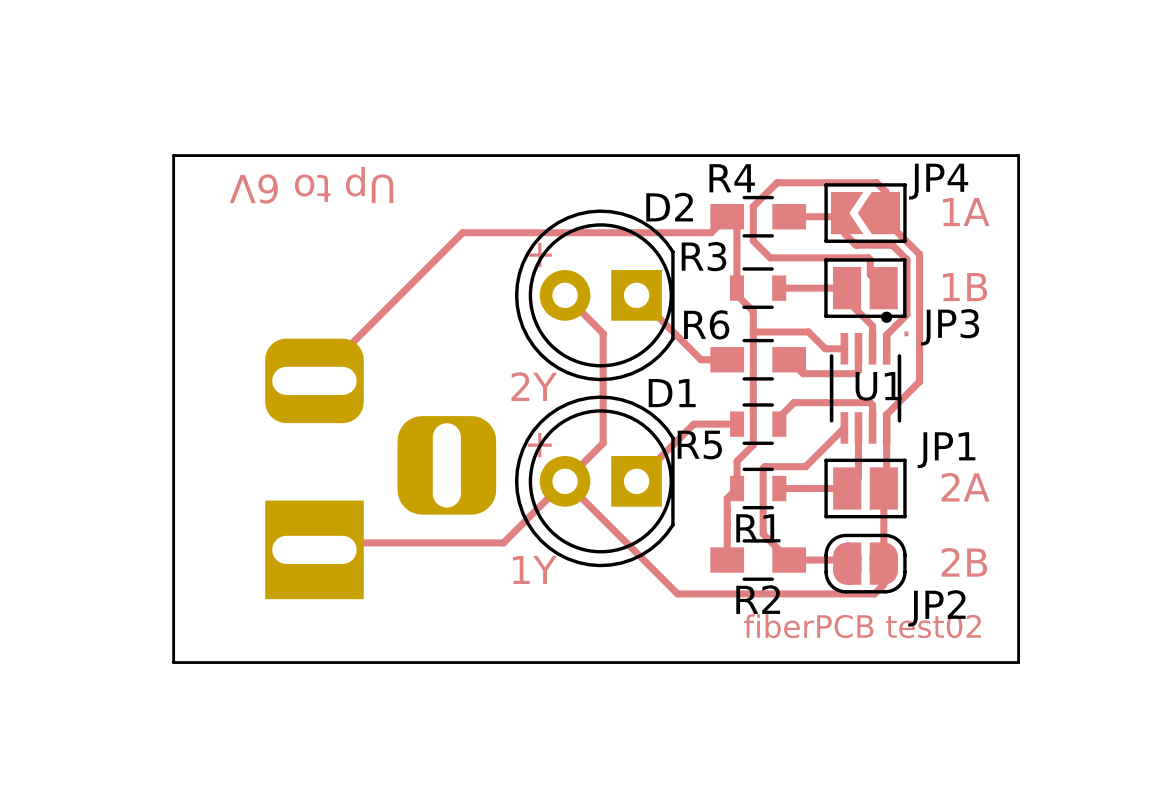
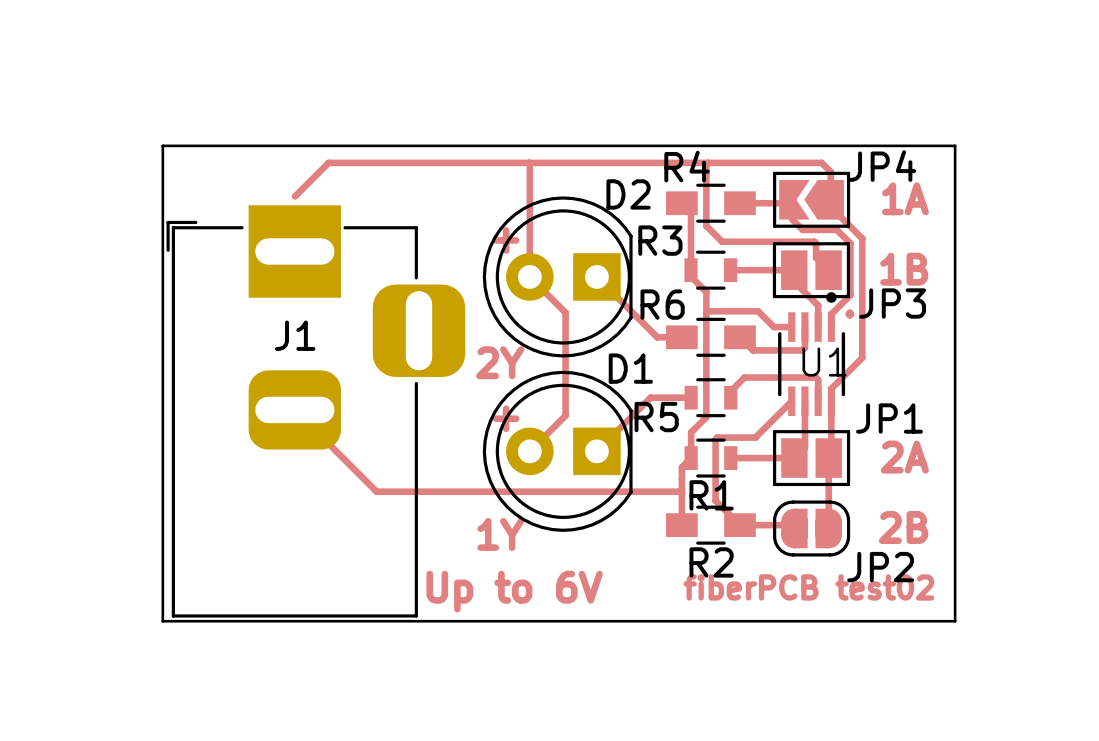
top track: none -> (529, 162) (529, 276)
text rotation: 0° (311, 185) -> 180° (514, 591)
text position: Up to 6V (311, 185) -> Up to 6V (514, 591)
top track: (885, 191) (876, 182) (777, 182) (753, 206) -> (707, 162) (706, 193)
top track: none -> (830, 179) (830, 171) (821, 162) (328, 162) (295, 196)
top track: (727, 216) (711, 232) (462, 232) (314, 380) -> none
top track: none -> (294, 409) (376, 491) (681, 491)
J1 side: bottom (380, 468) -> top (315, 411)
top track: (314, 549) (321, 542) (503, 542) (565, 481) (677, 593) (874, 593) (883, 584) (883, 563) -> none

